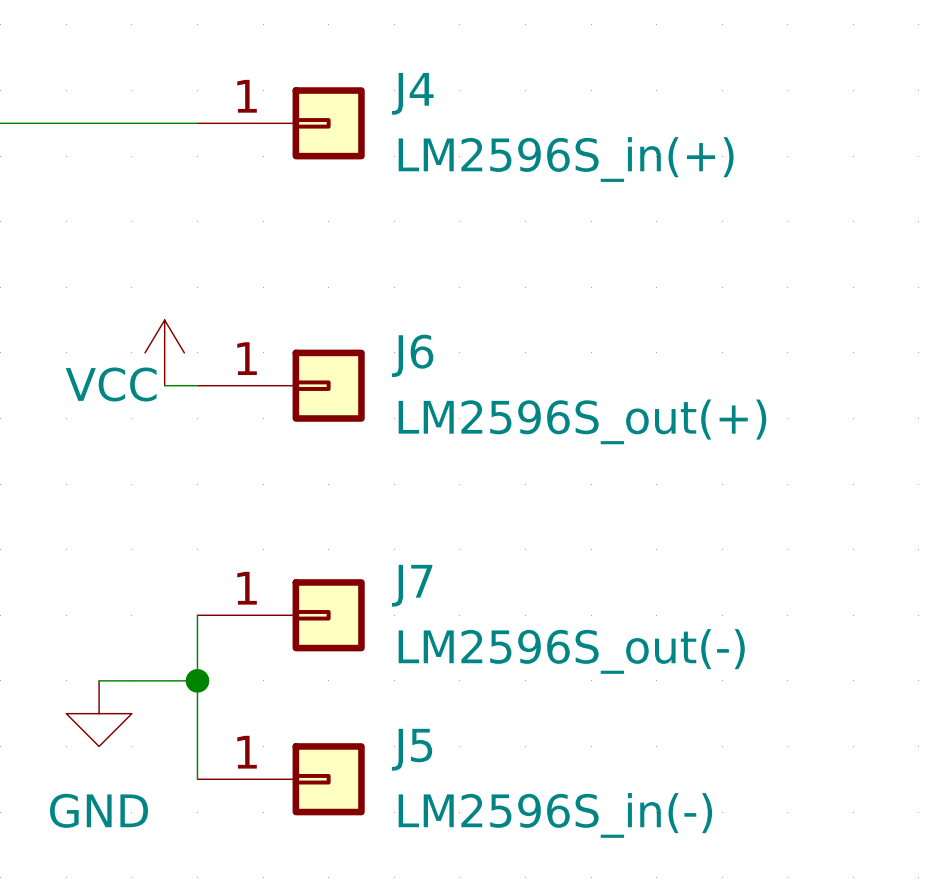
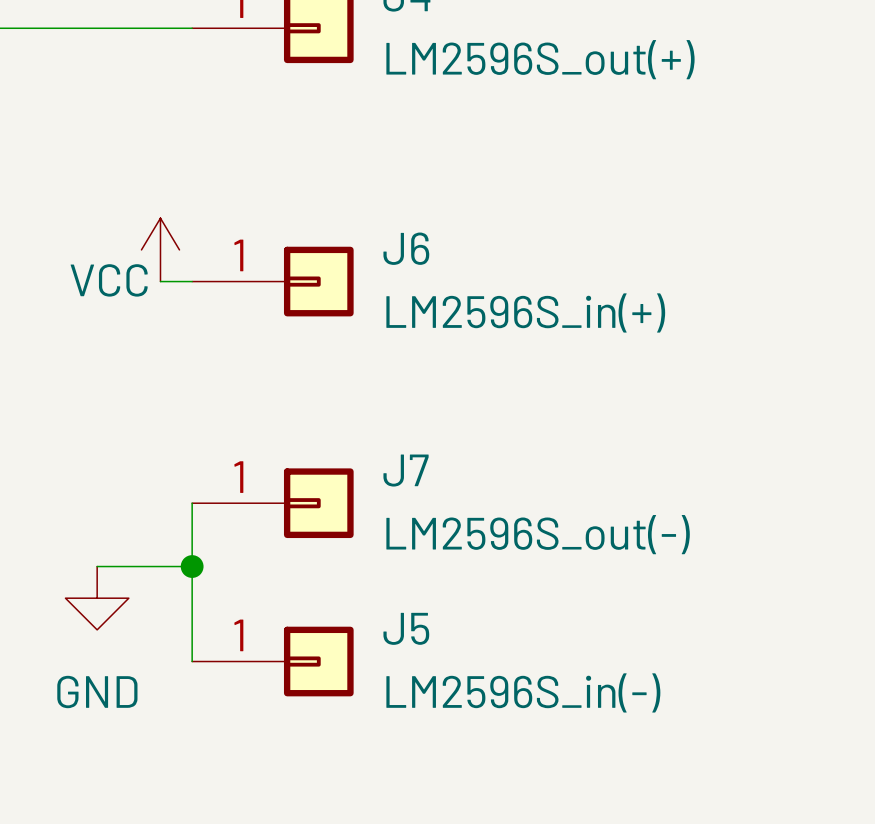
J4 value: LM2596S_in(+) (566, 159) -> LM2596S_out(+) (540, 59)
J6 value: LM2596S_out(+) (582, 421) -> LM2596S_in(+) (525, 312)

